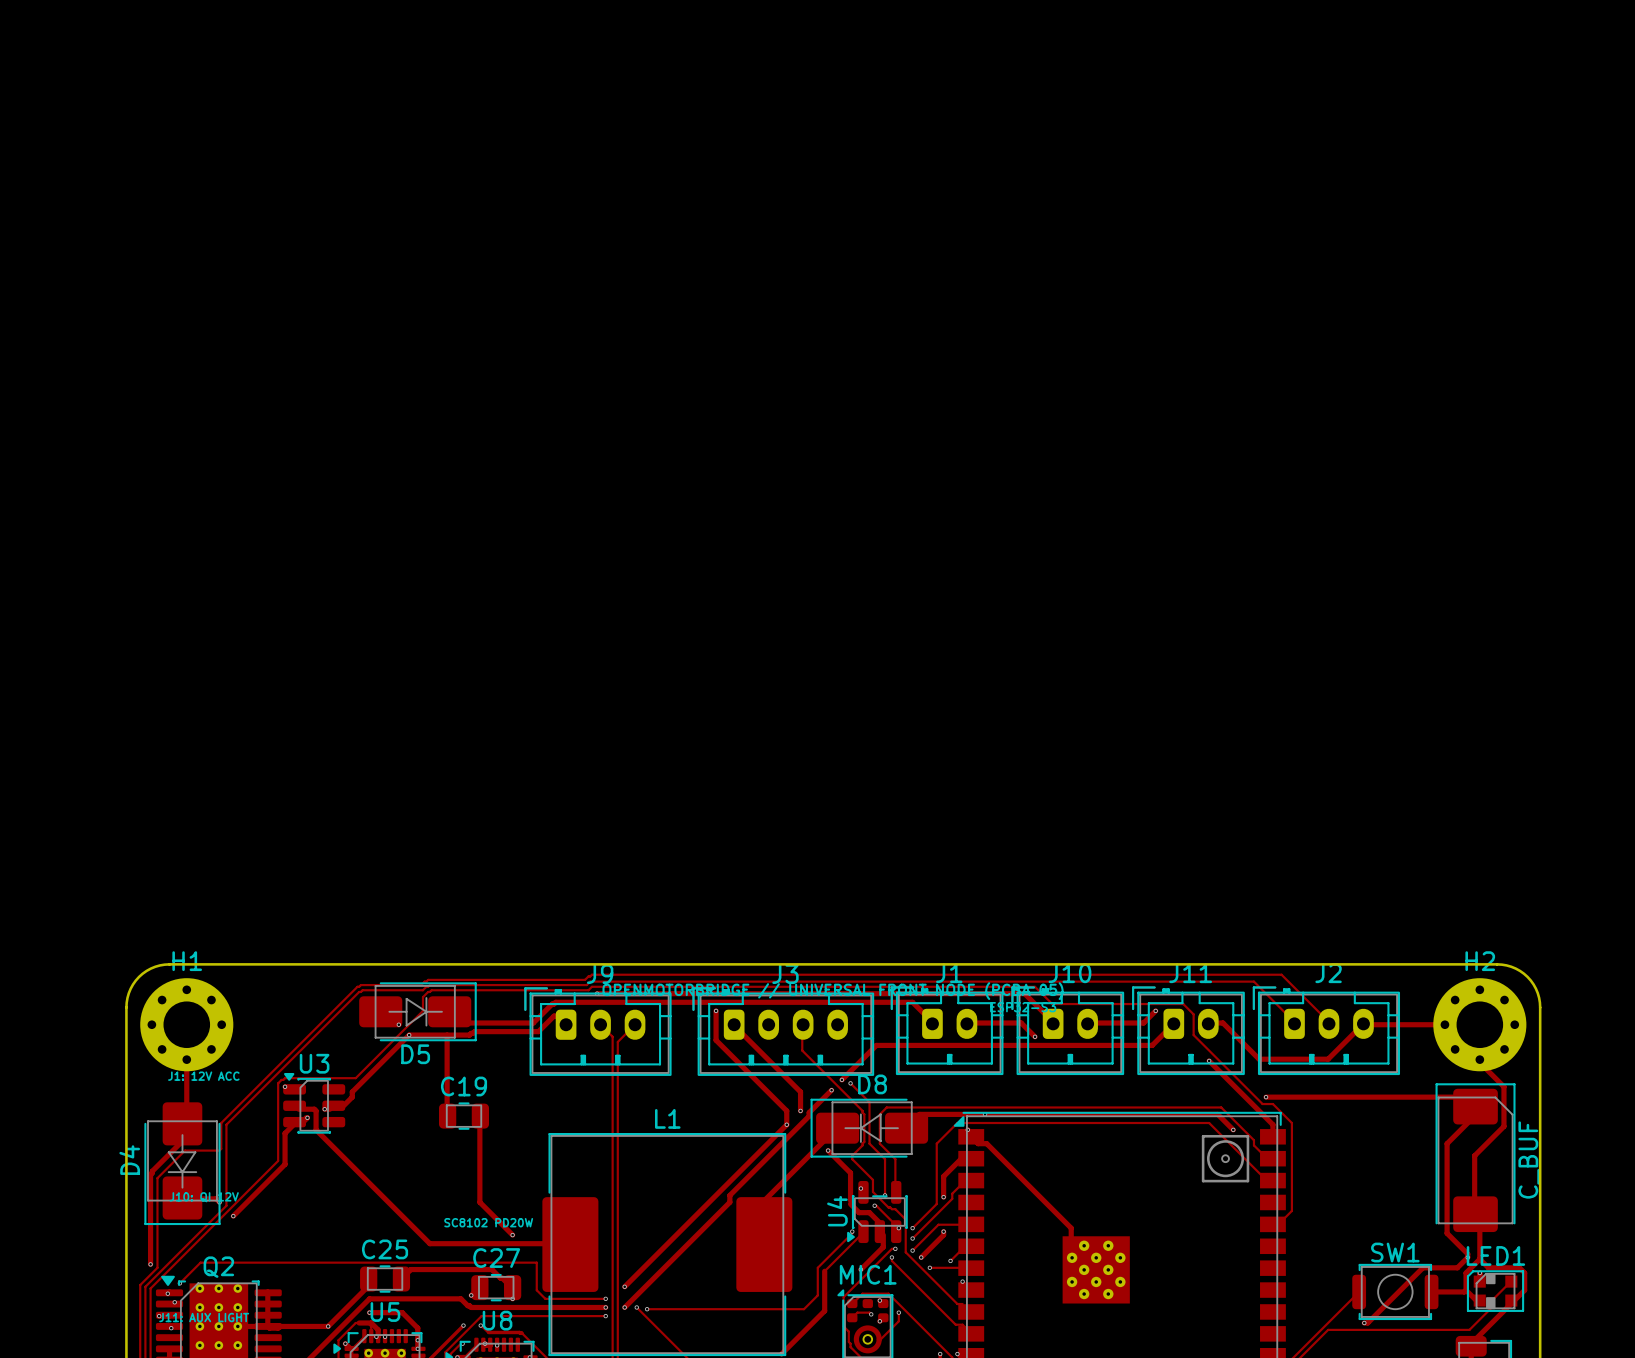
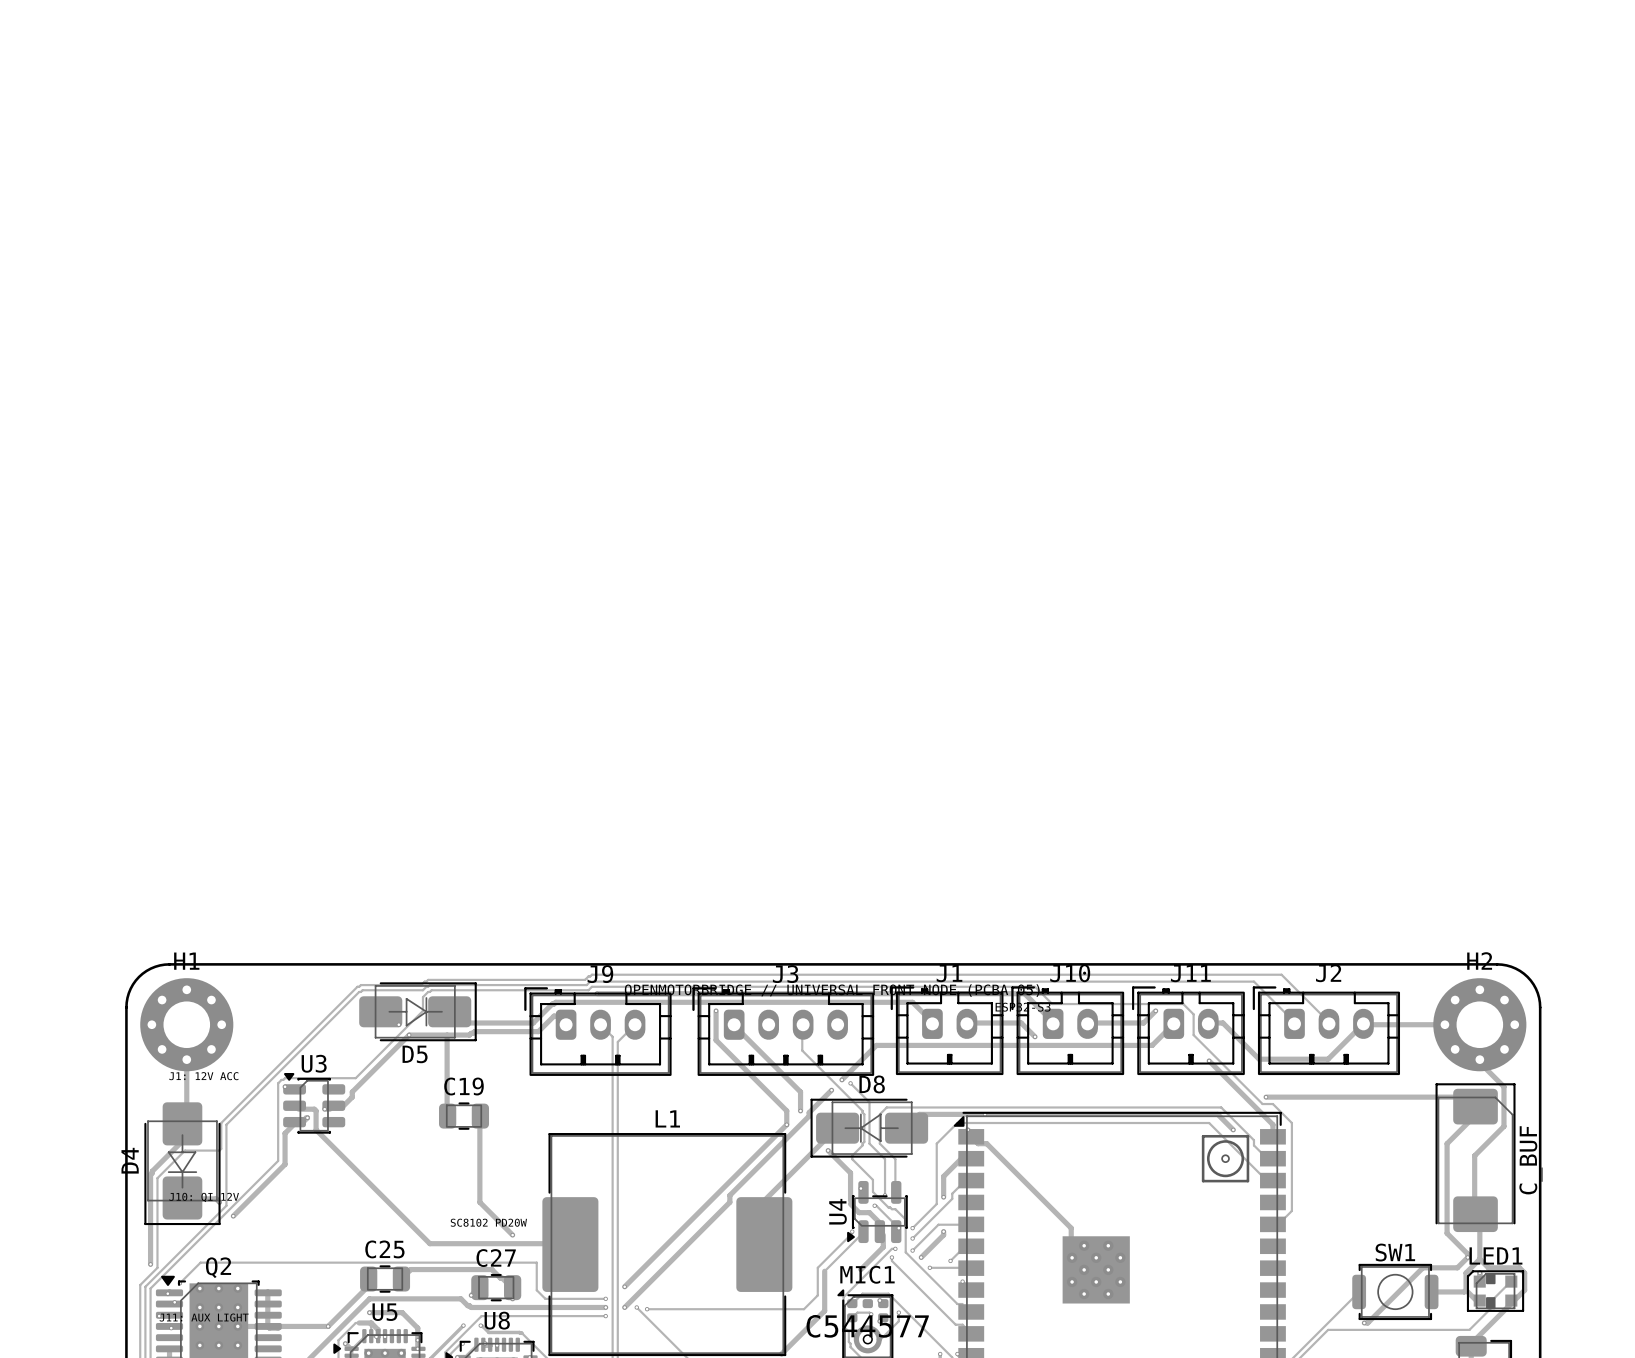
MIC1 text: none -> C544577 (867, 1326)

